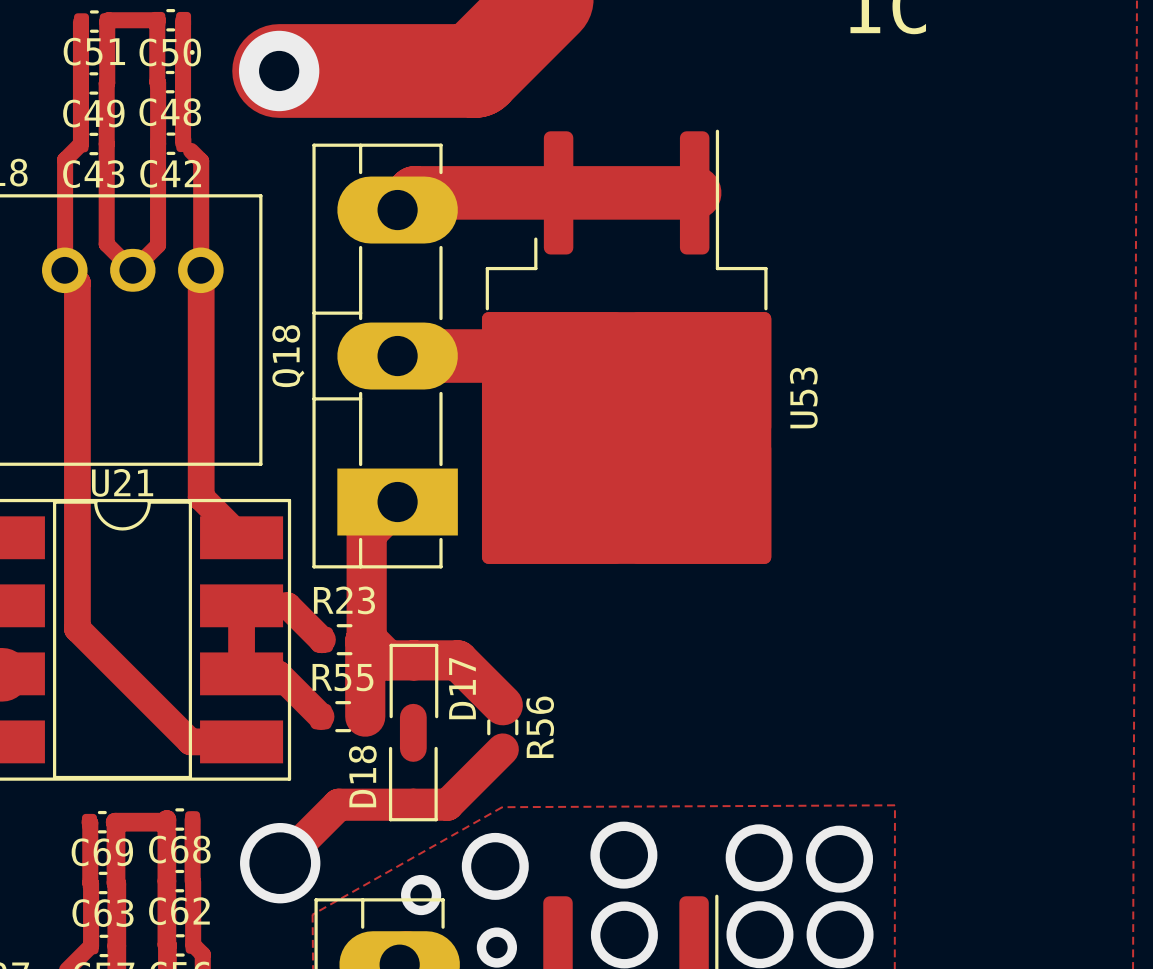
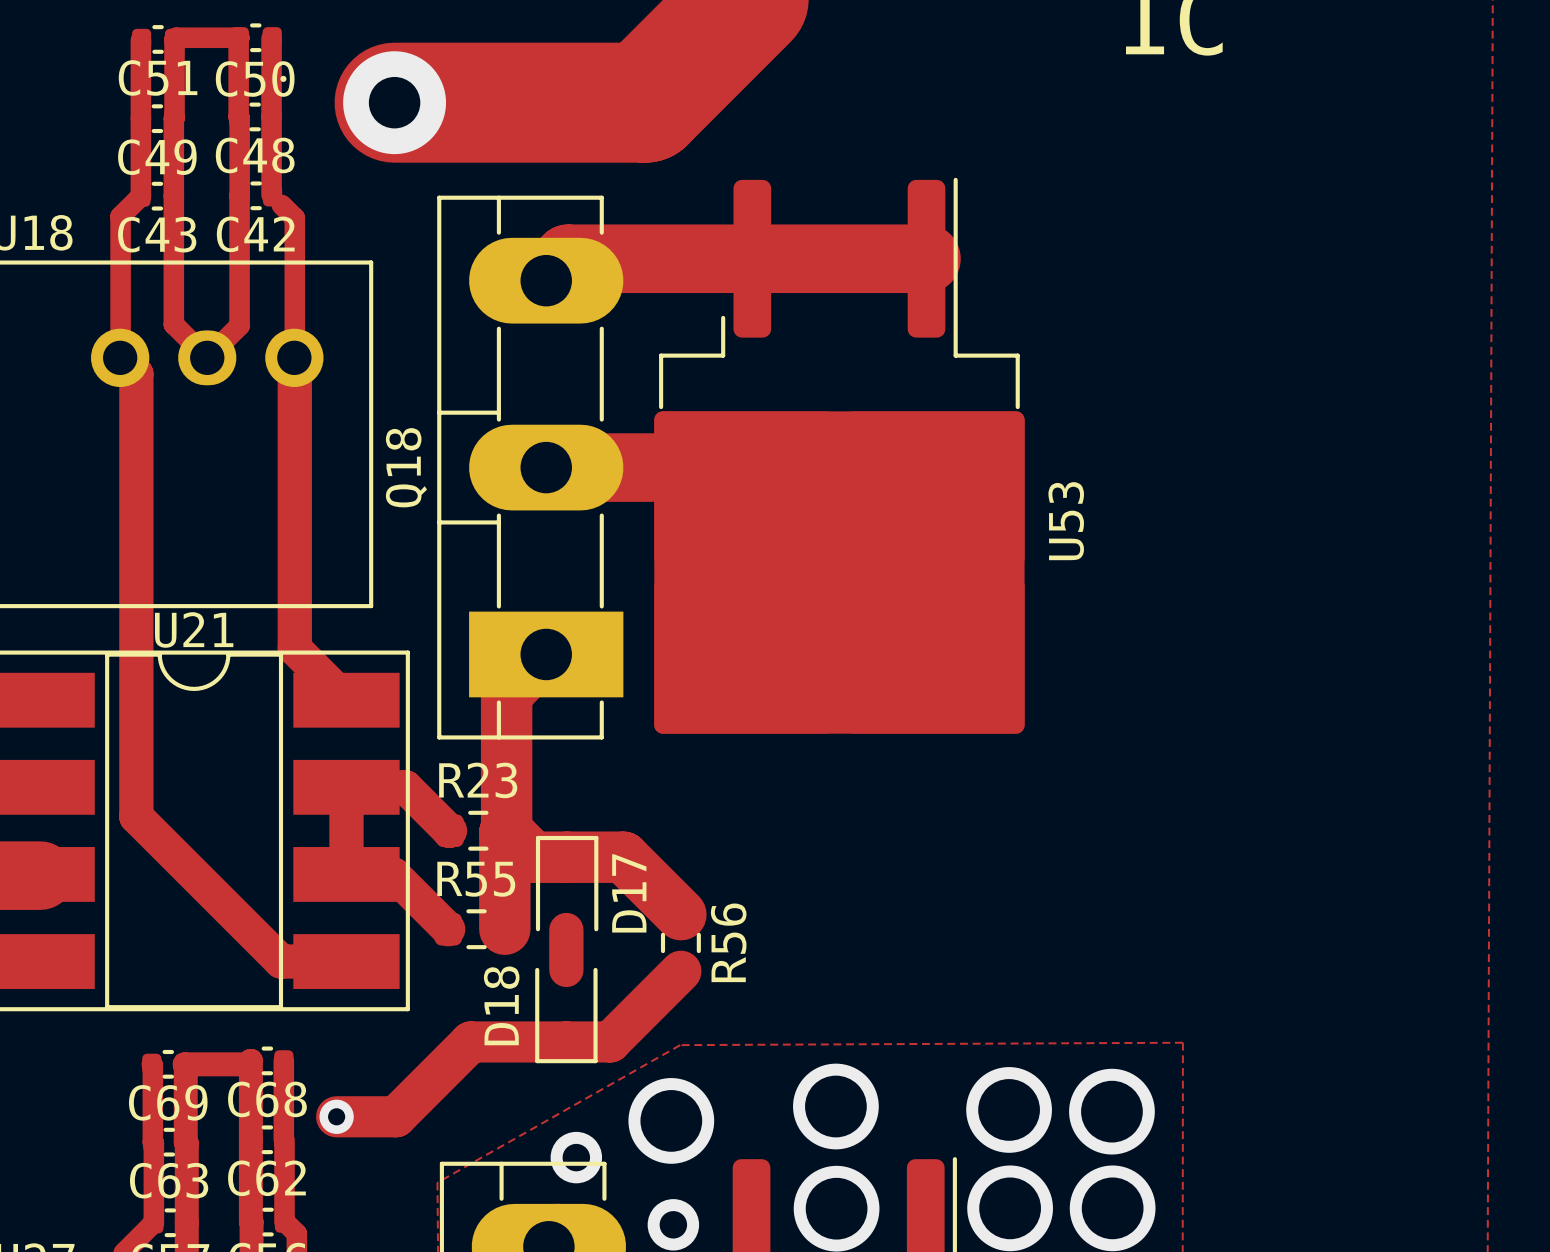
track: none -> (336, 1116) (395, 1116)
via: none -> (336, 1116)
via: (280, 863) -> none

